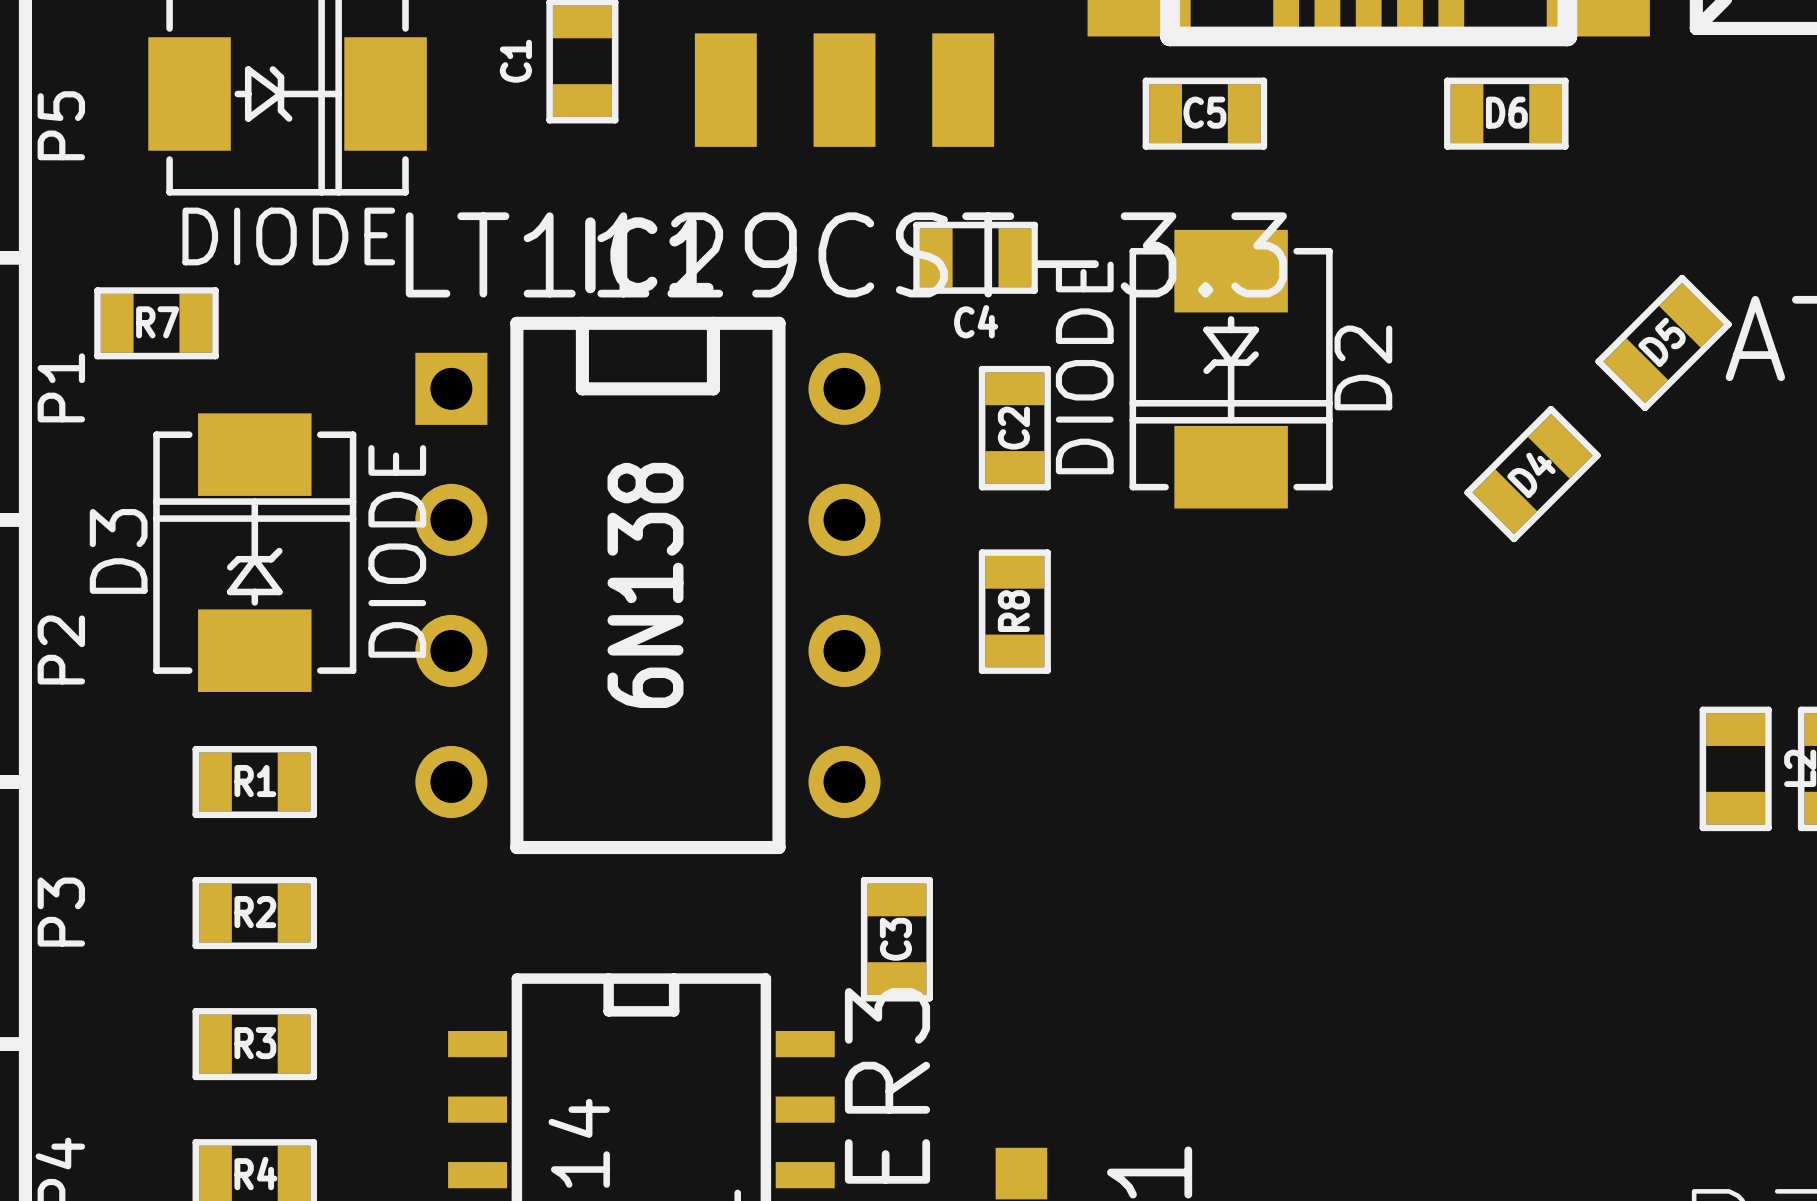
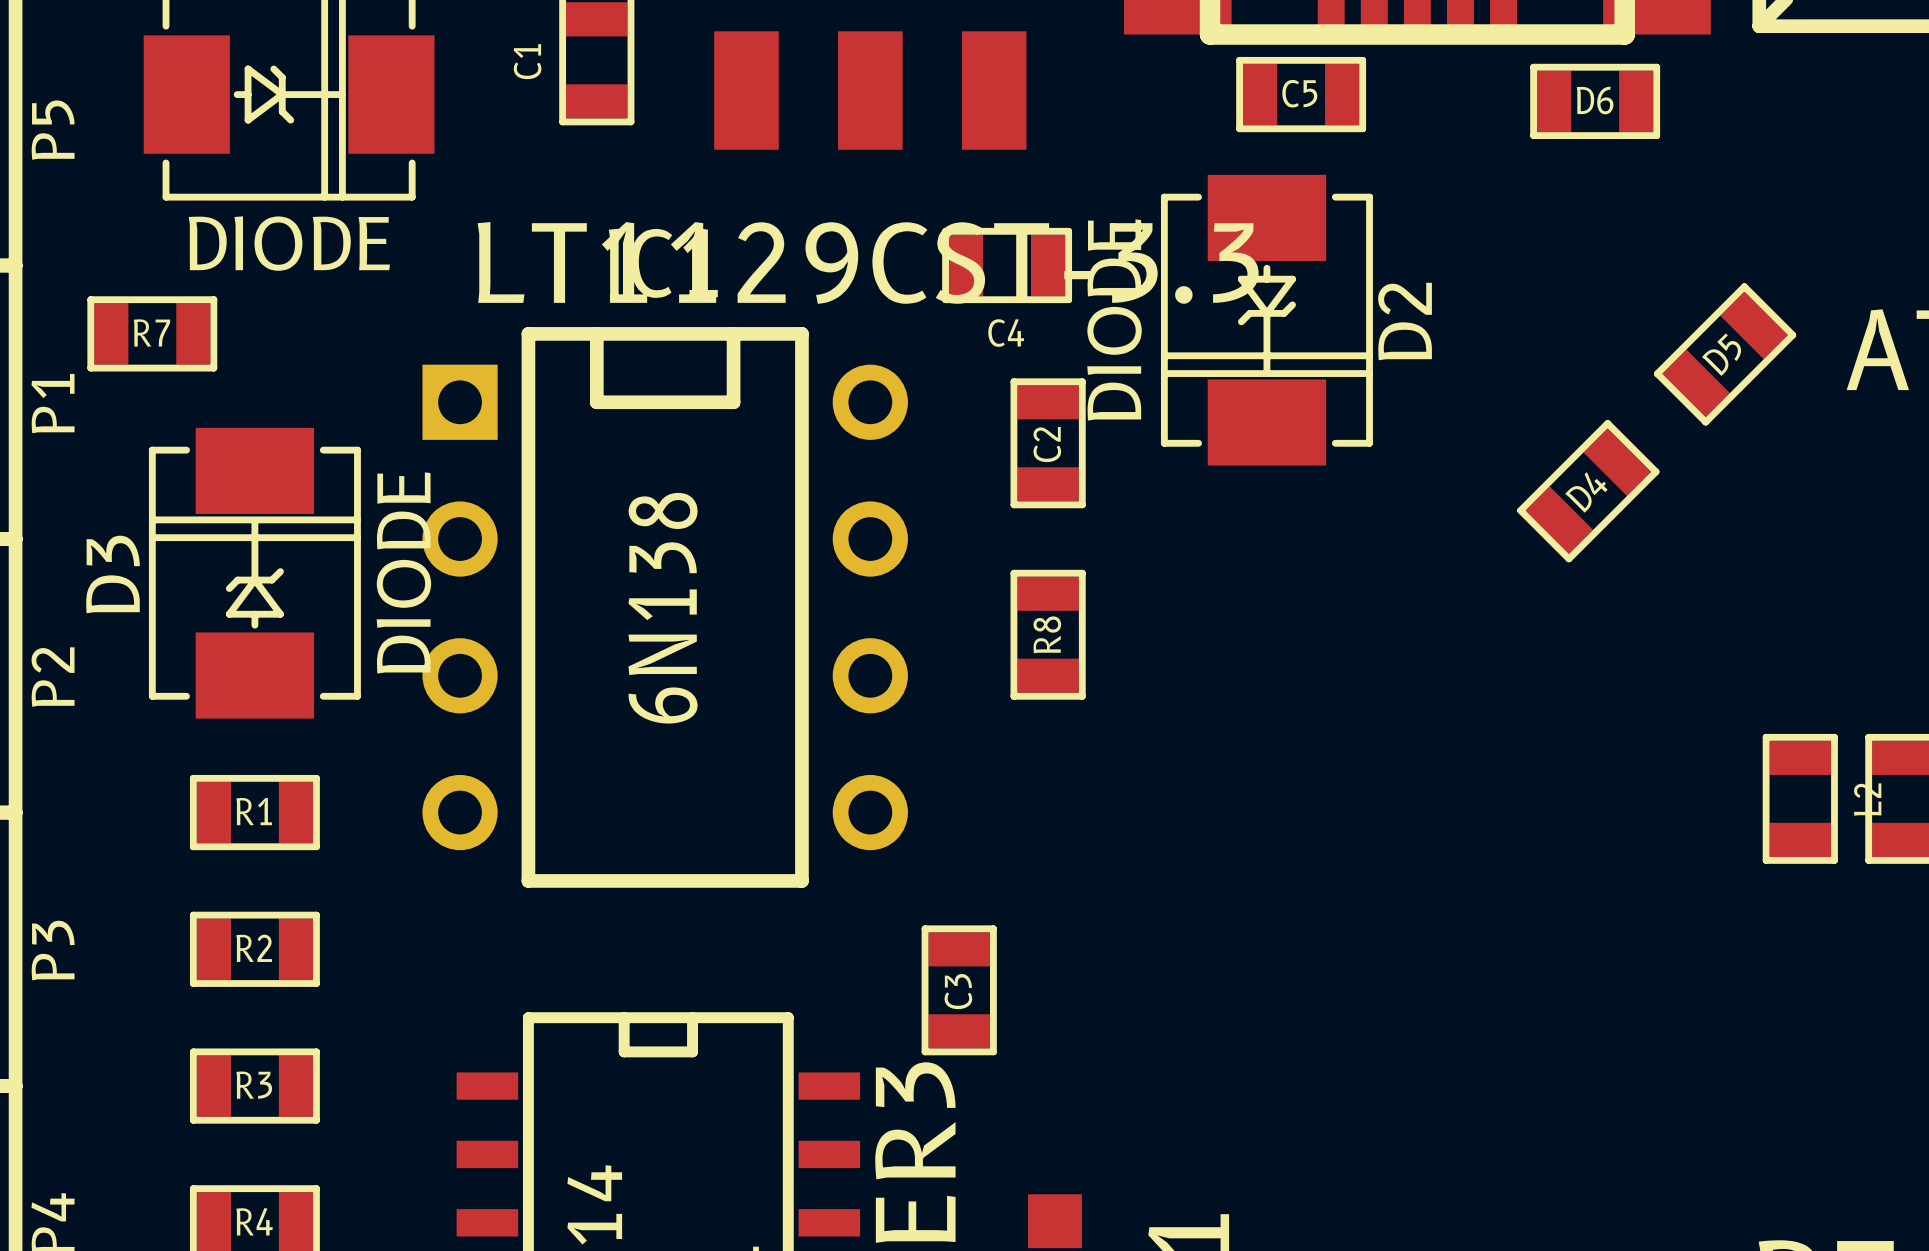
C5 position: (1204, 113) -> (1301, 94)
D6 position: (1506, 113) -> (1595, 101)
D2 position: (1231, 369) -> (1266, 320)
C3 position: (896, 939) -> (959, 990)

